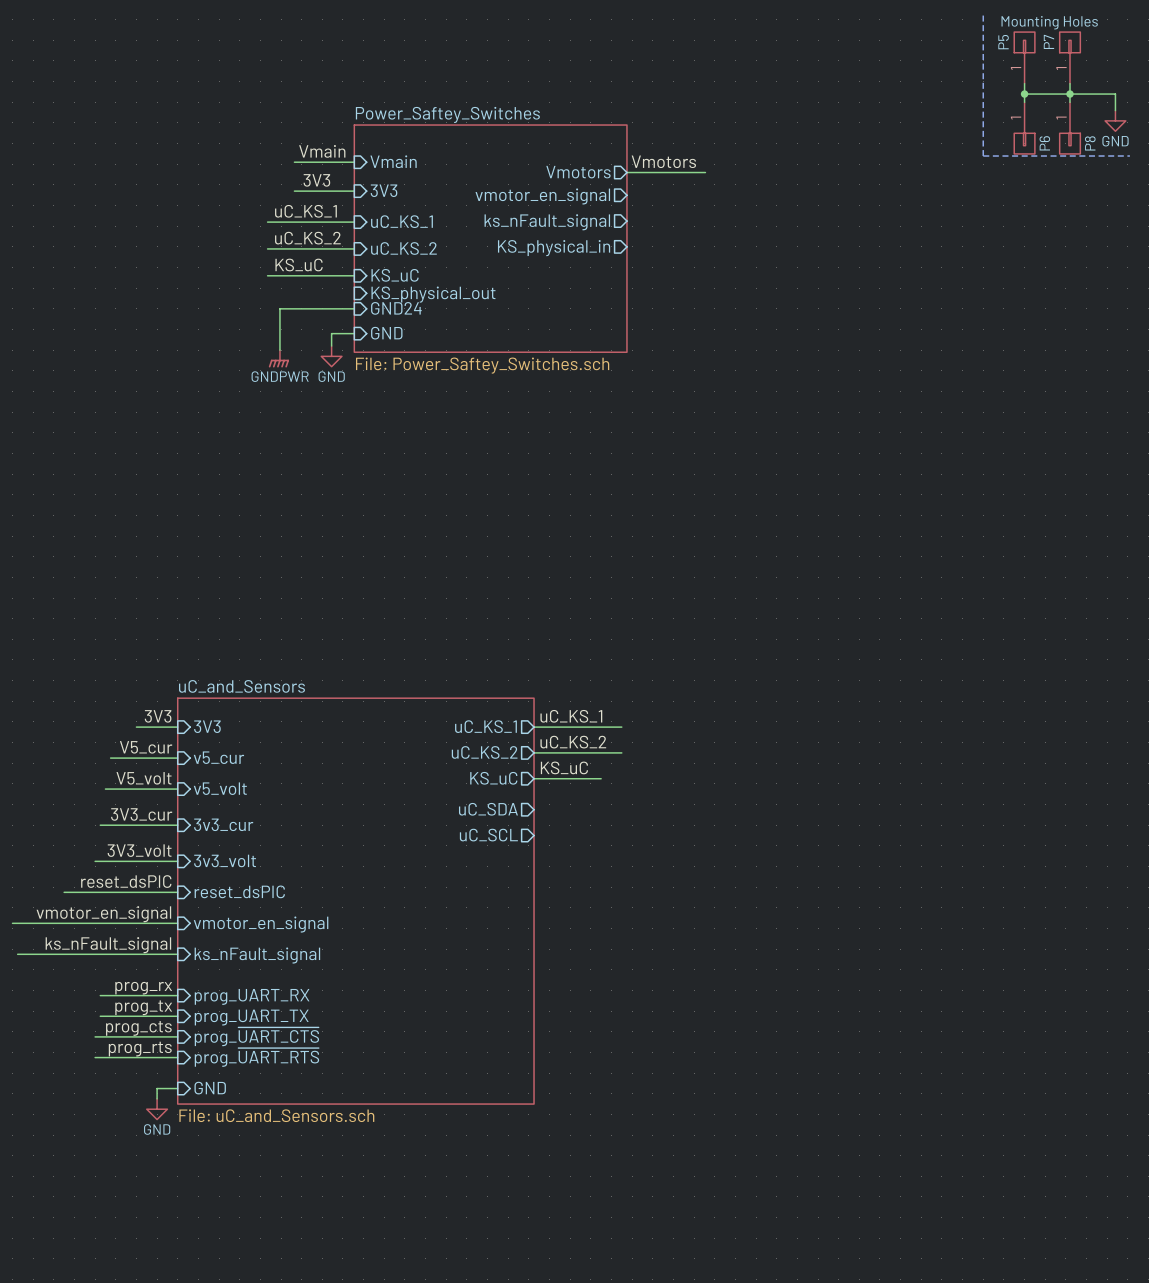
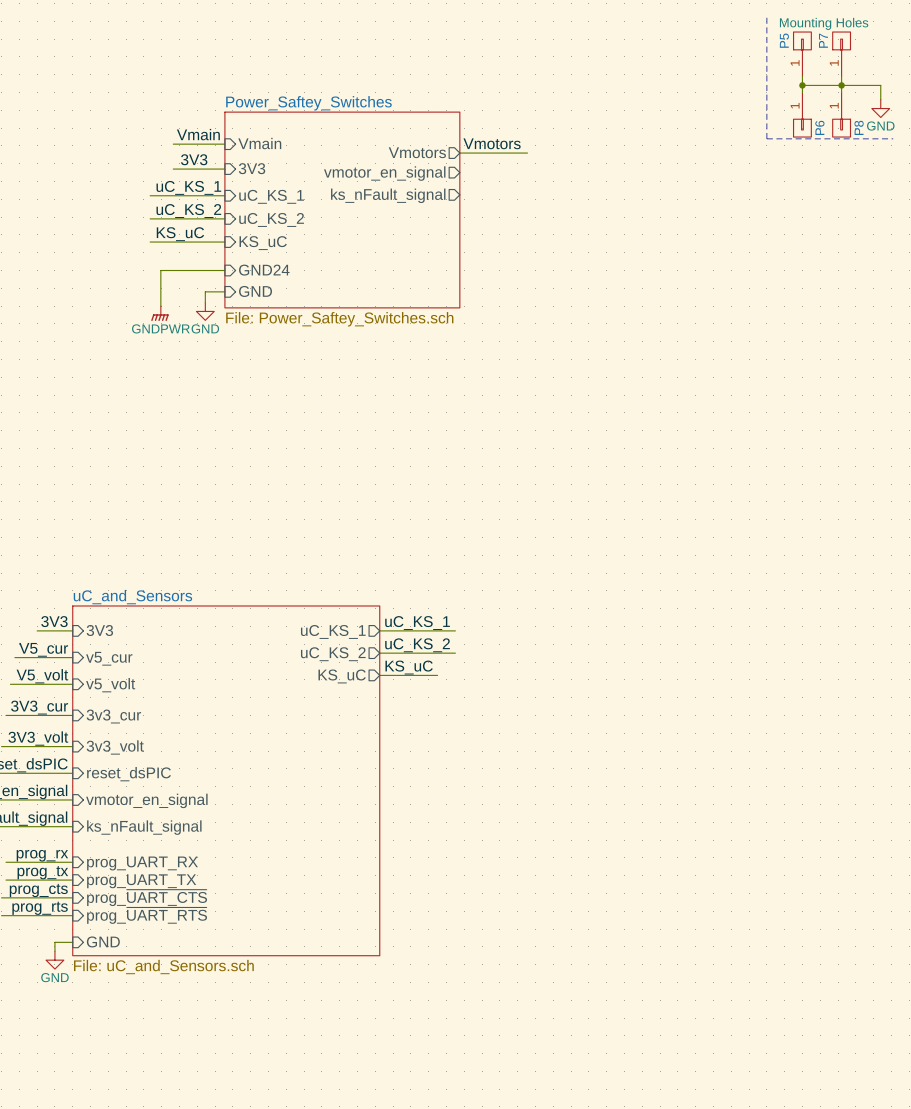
sheet pin: KS_physical_in (554, 248) -> none
sheet pin: KS_physical_out (433, 294) -> none
sheet pin: uC_SDA (488, 809) -> none
sheet pin: uC_SCL (488, 835) -> none

